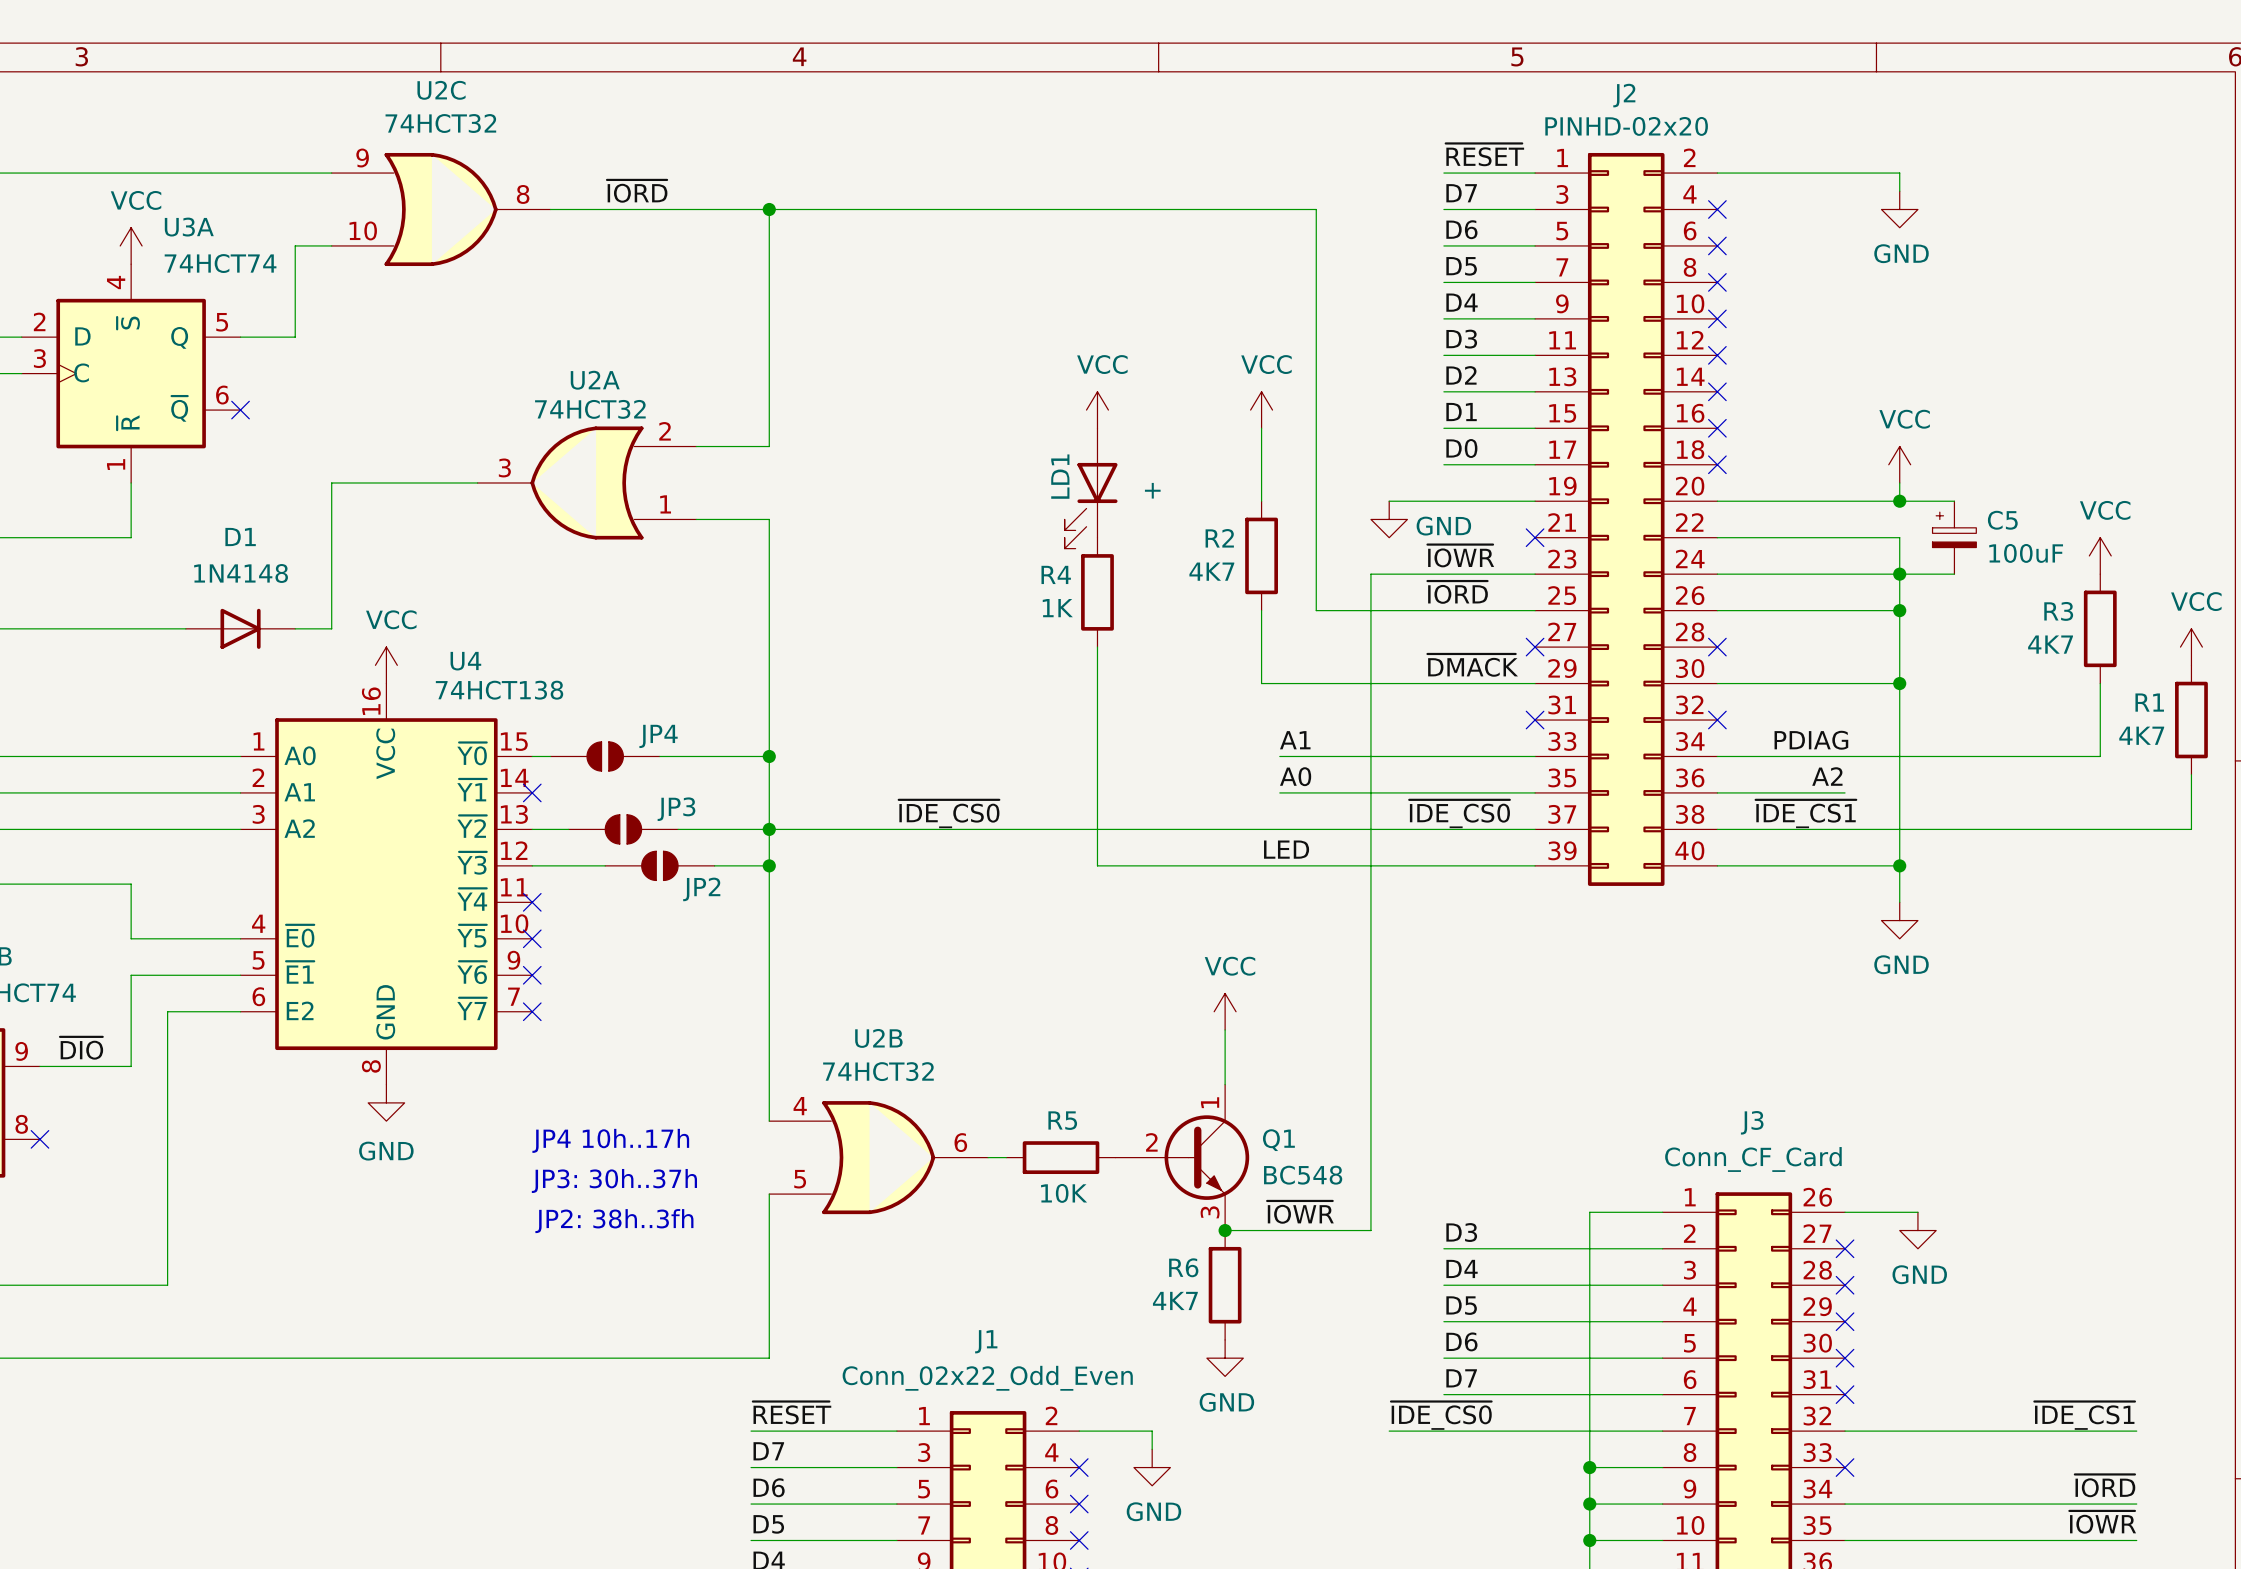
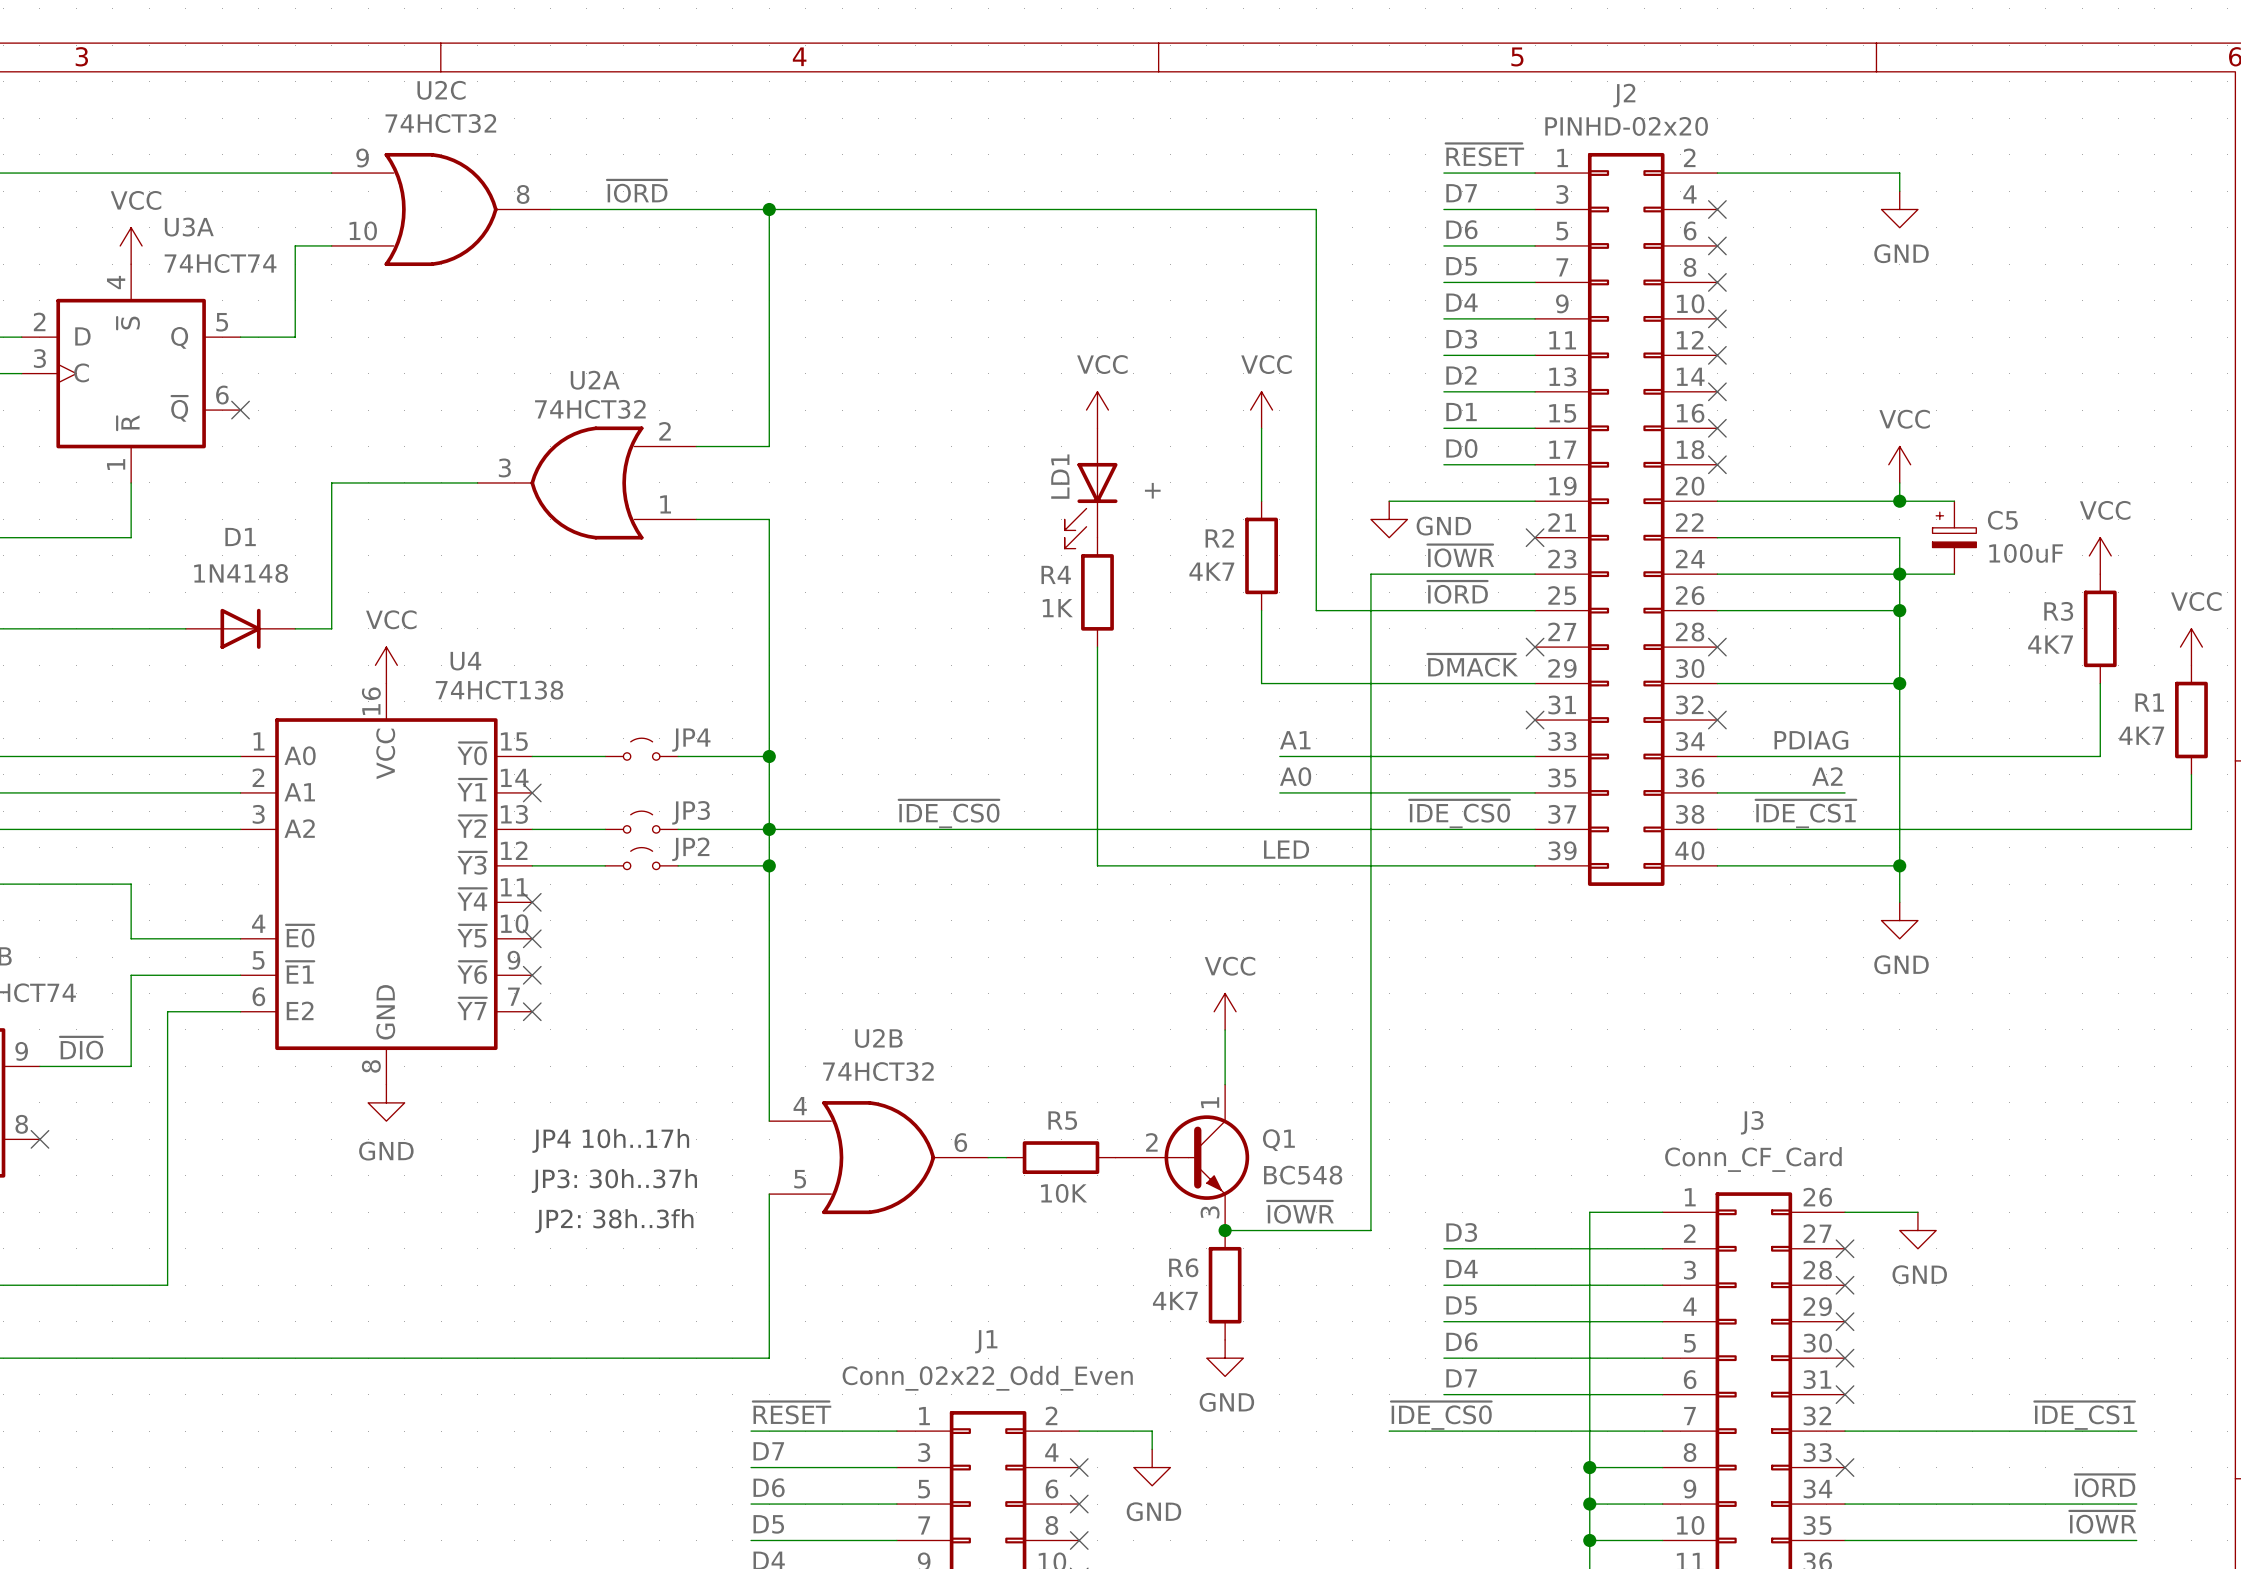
JP4 symbol: [550, 741, 660, 772] -> [605, 738, 679, 761]
JP3 symbol: [568, 814, 679, 845] -> [605, 811, 679, 834]
JP2 symbol: [605, 851, 715, 881] -> [605, 847, 679, 870]
JP2 name position: JP2 (701, 889) -> JP2 (690, 849)

